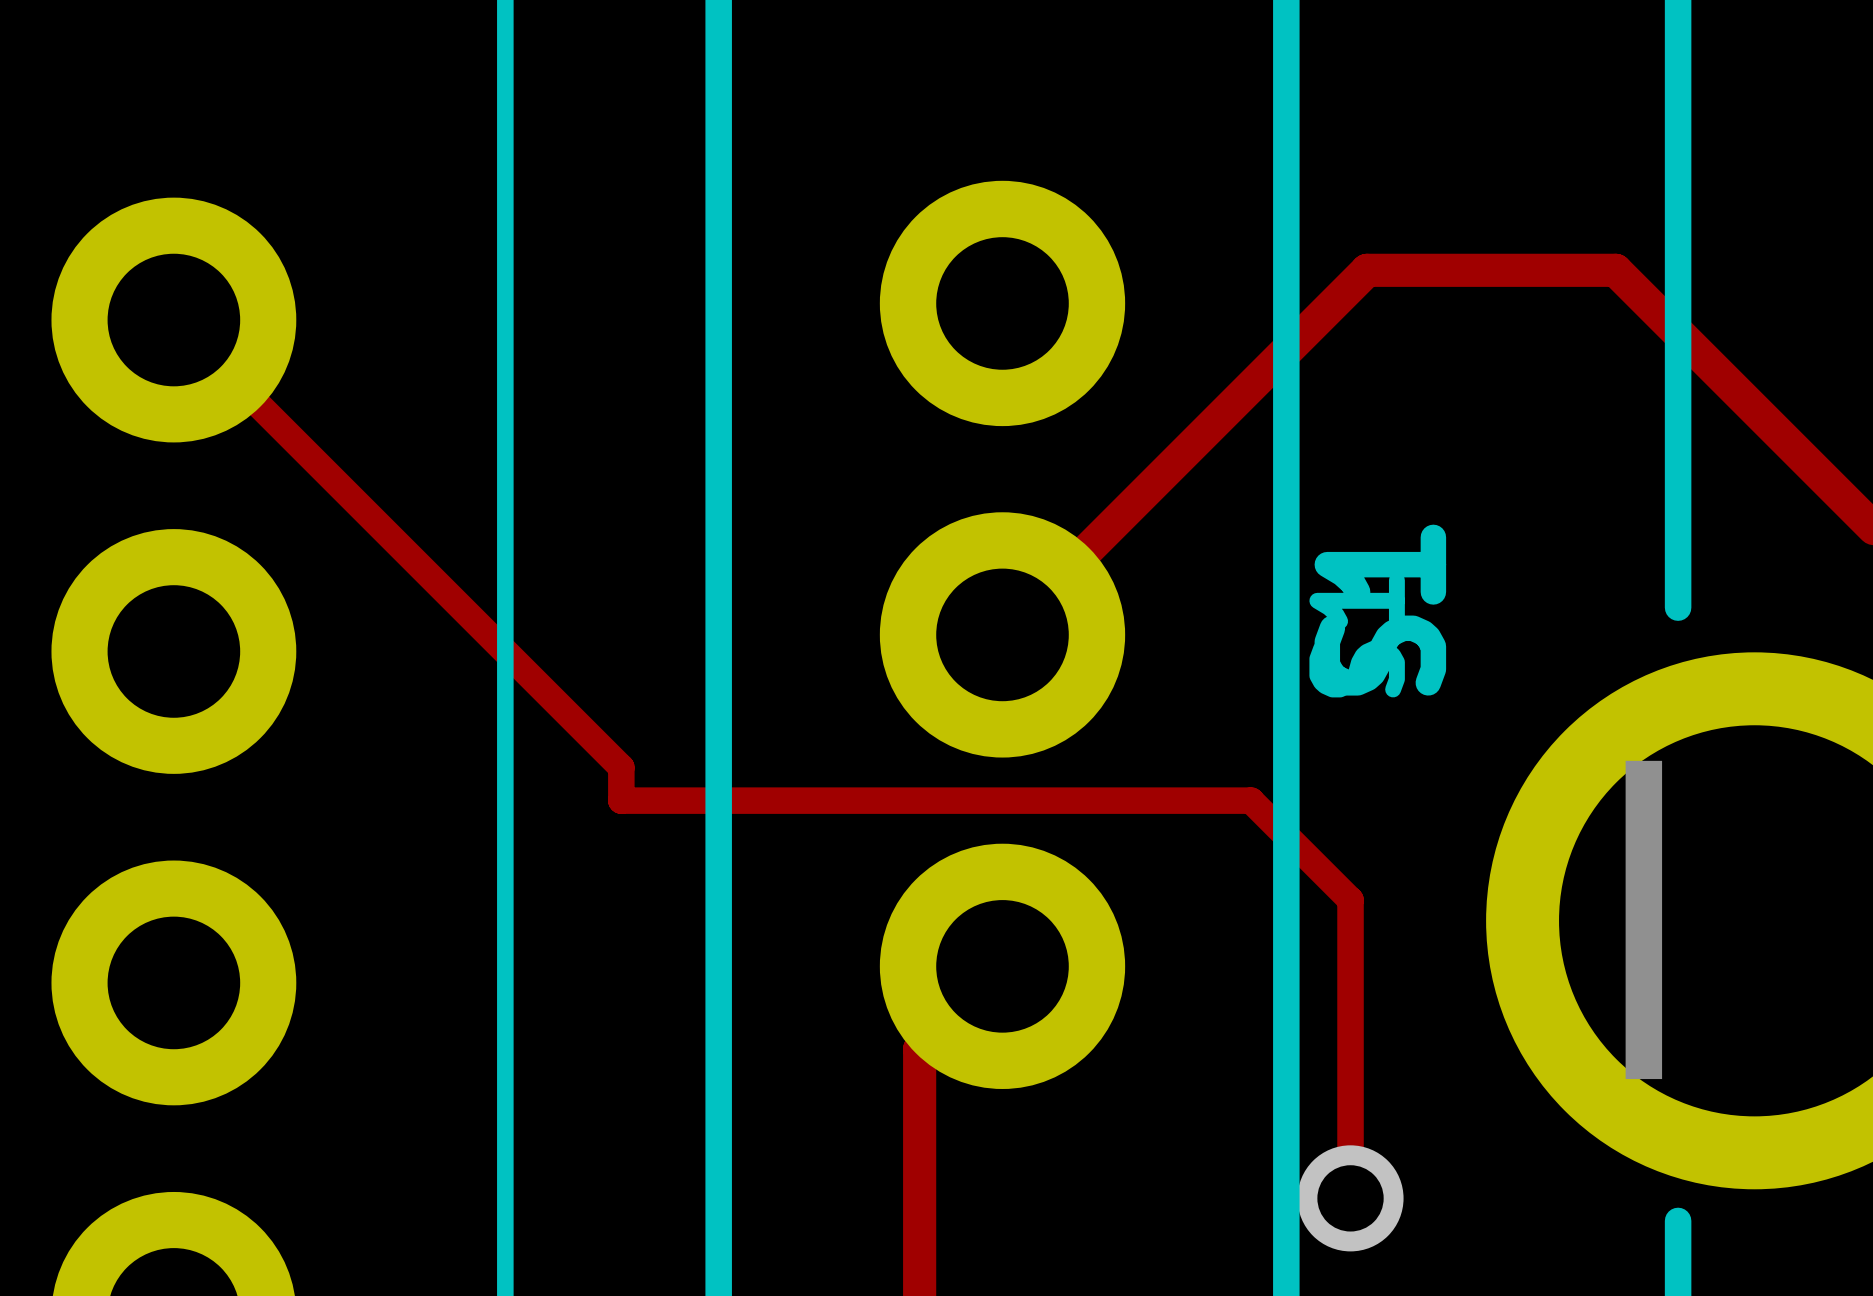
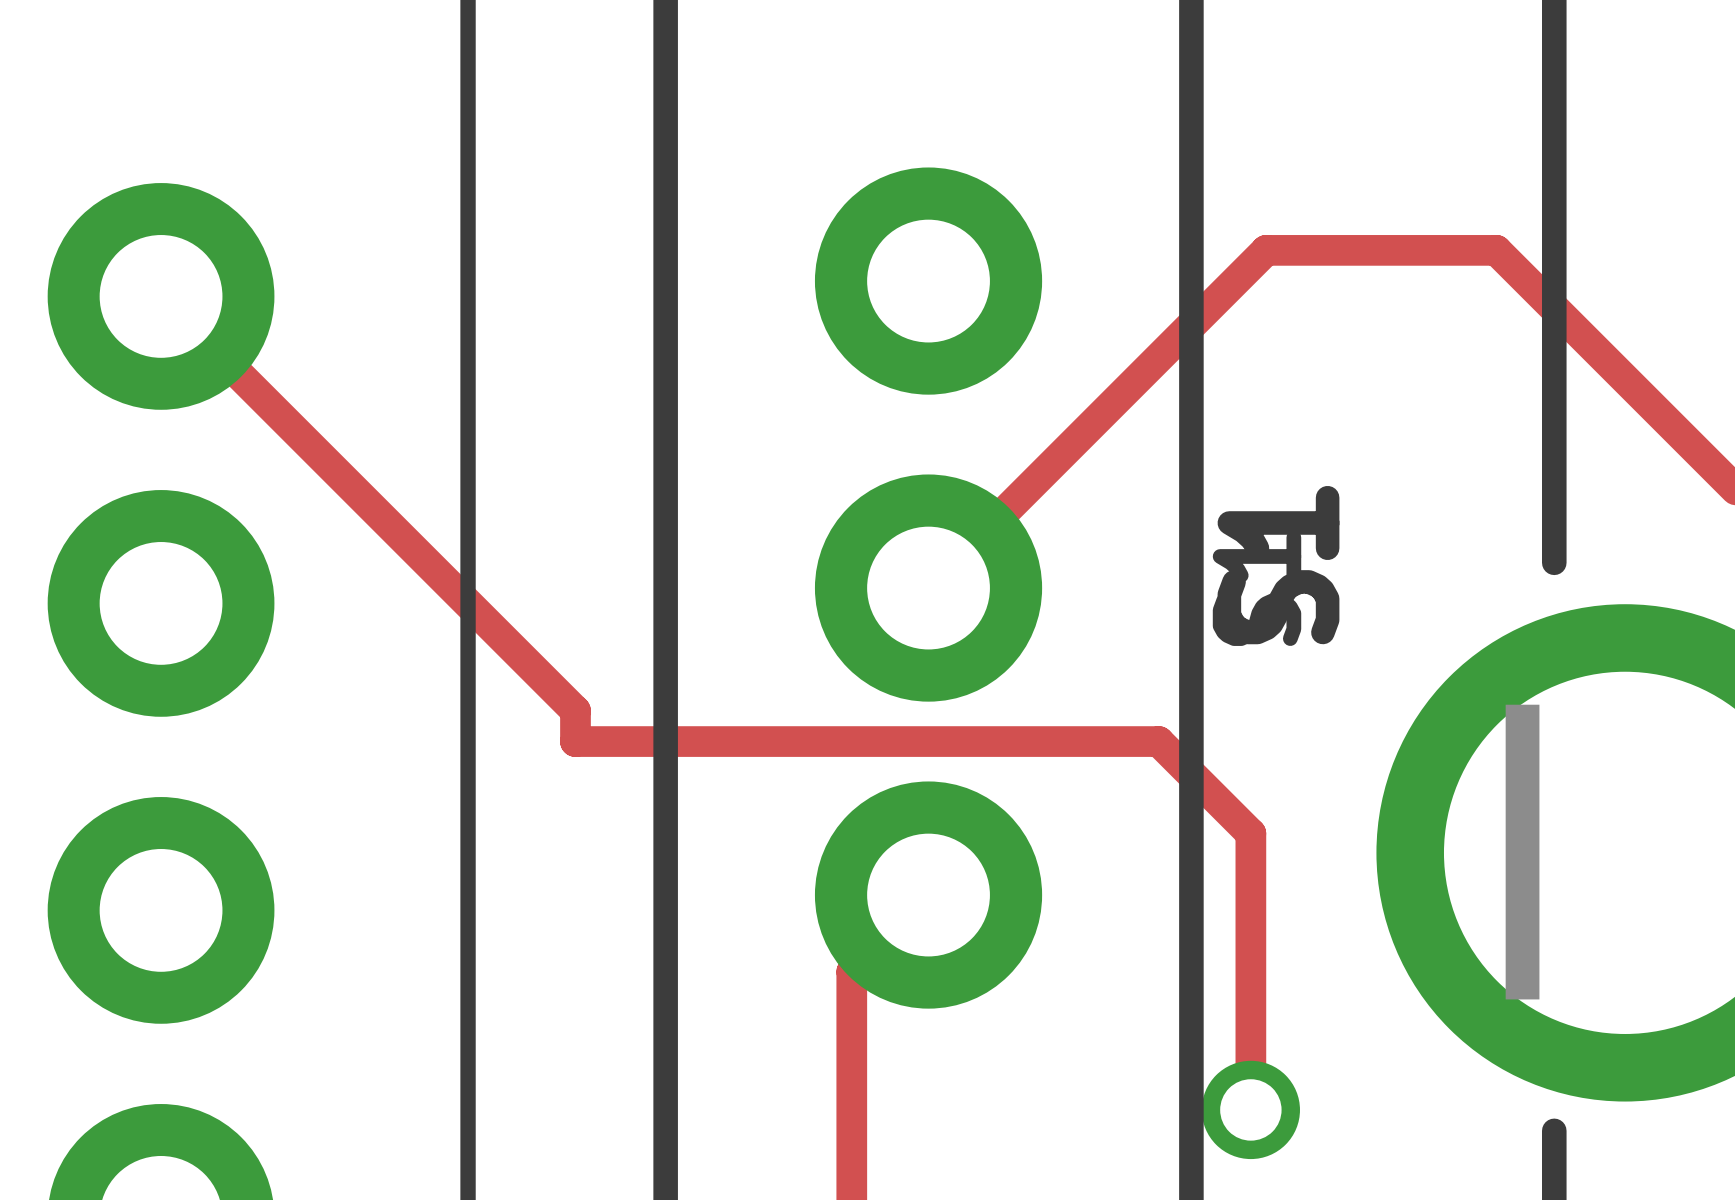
track width: thin (173, 320) (621, 767) (621, 800) (1251, 800) (1350, 900) (1350, 1198) -> thick (161, 296) (575, 710) (575, 741) (1158, 741) (1250, 833) (1250, 1109)

